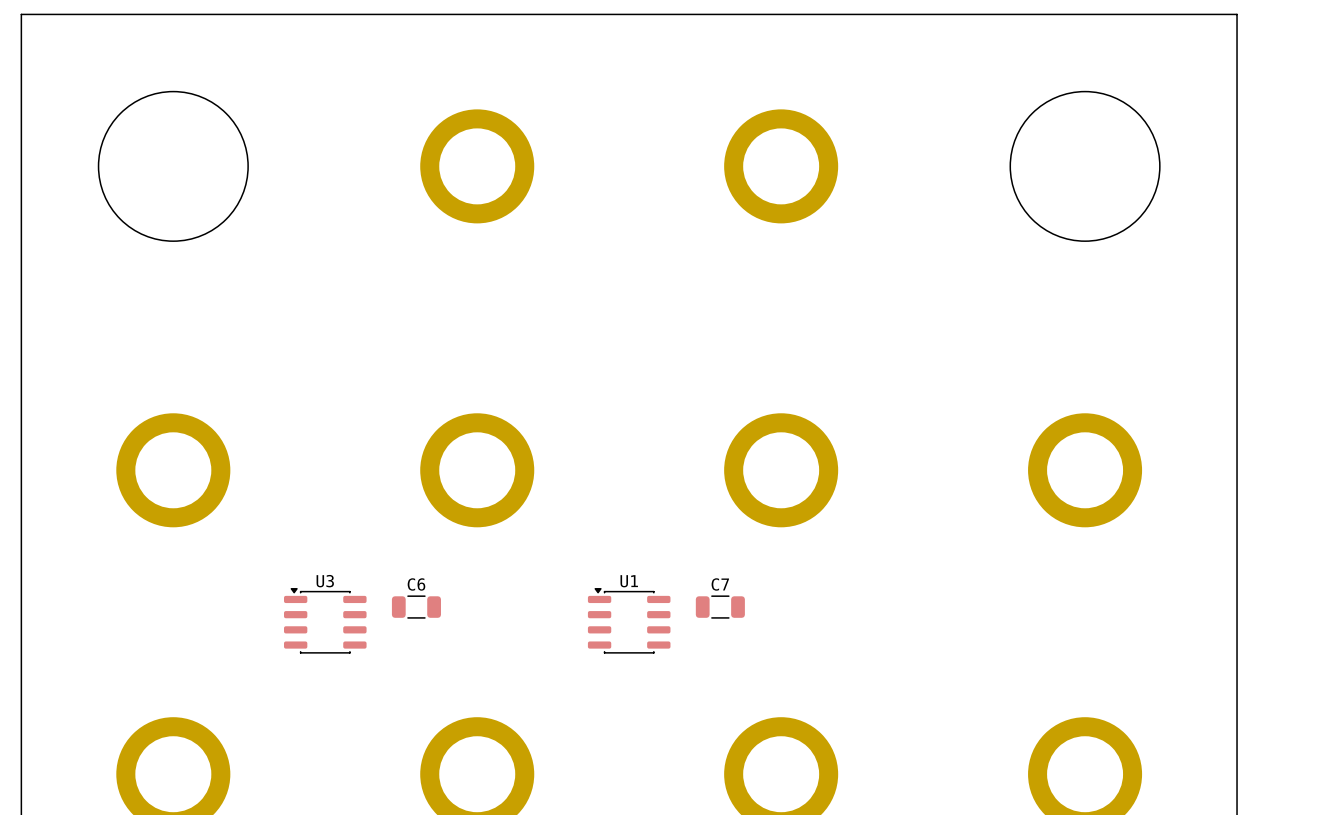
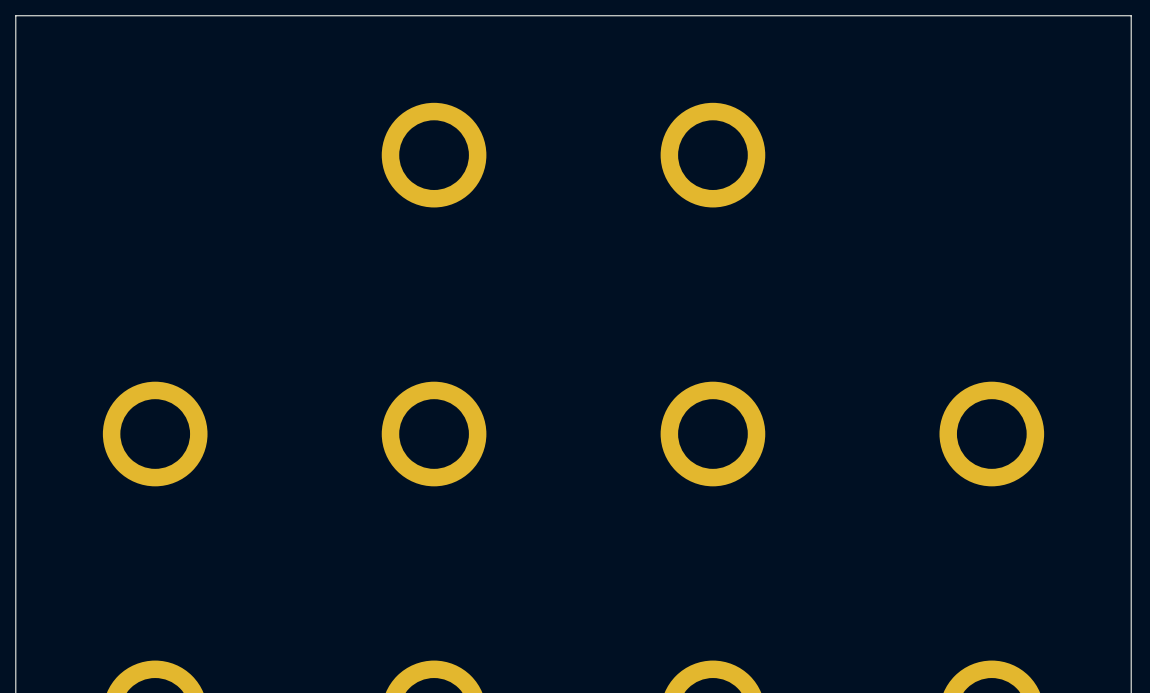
round board edge: [98, 91, 249, 242] -> none
round board edge: [1009, 91, 1161, 242] -> none
C6: (416, 607) -> none
C7: (720, 607) -> none
U3: (325, 620) -> none
U1: (629, 620) -> none

